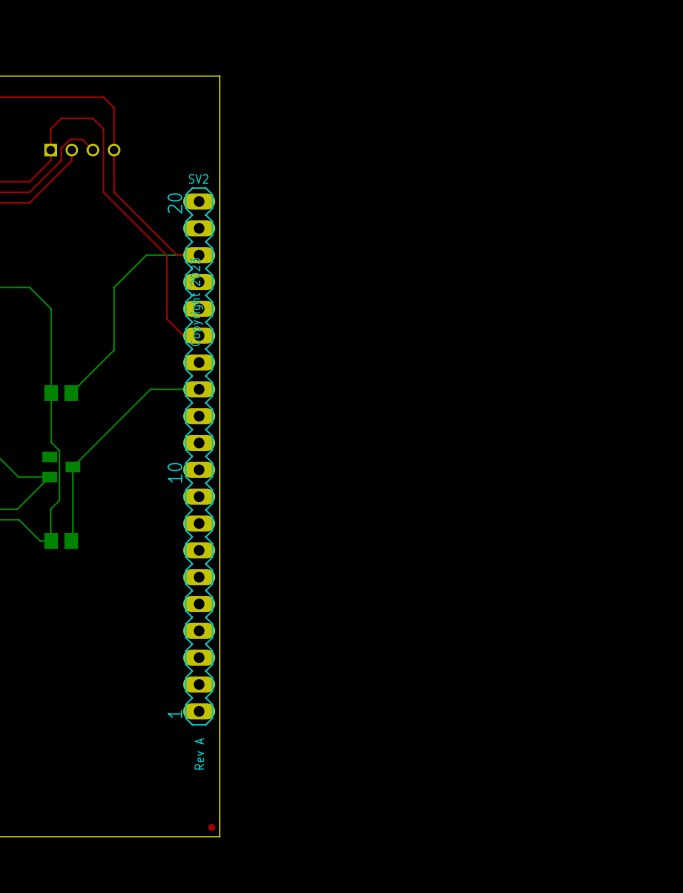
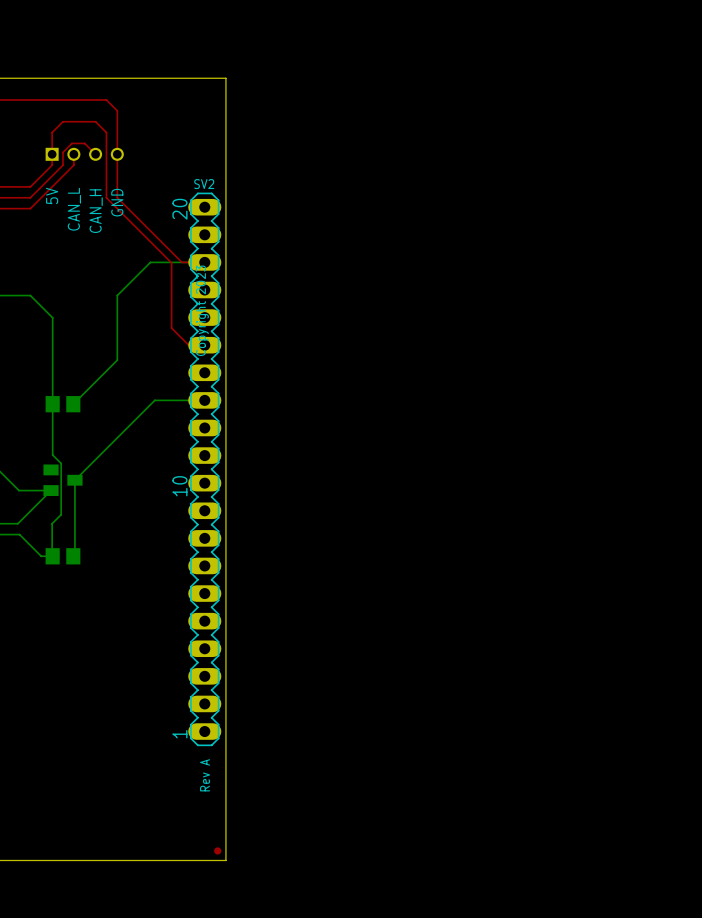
text: none -> 5V (52, 196)
text: none -> GND (117, 202)
text: none -> CAN_L (74, 209)
text: none -> CAN_H (96, 211)

